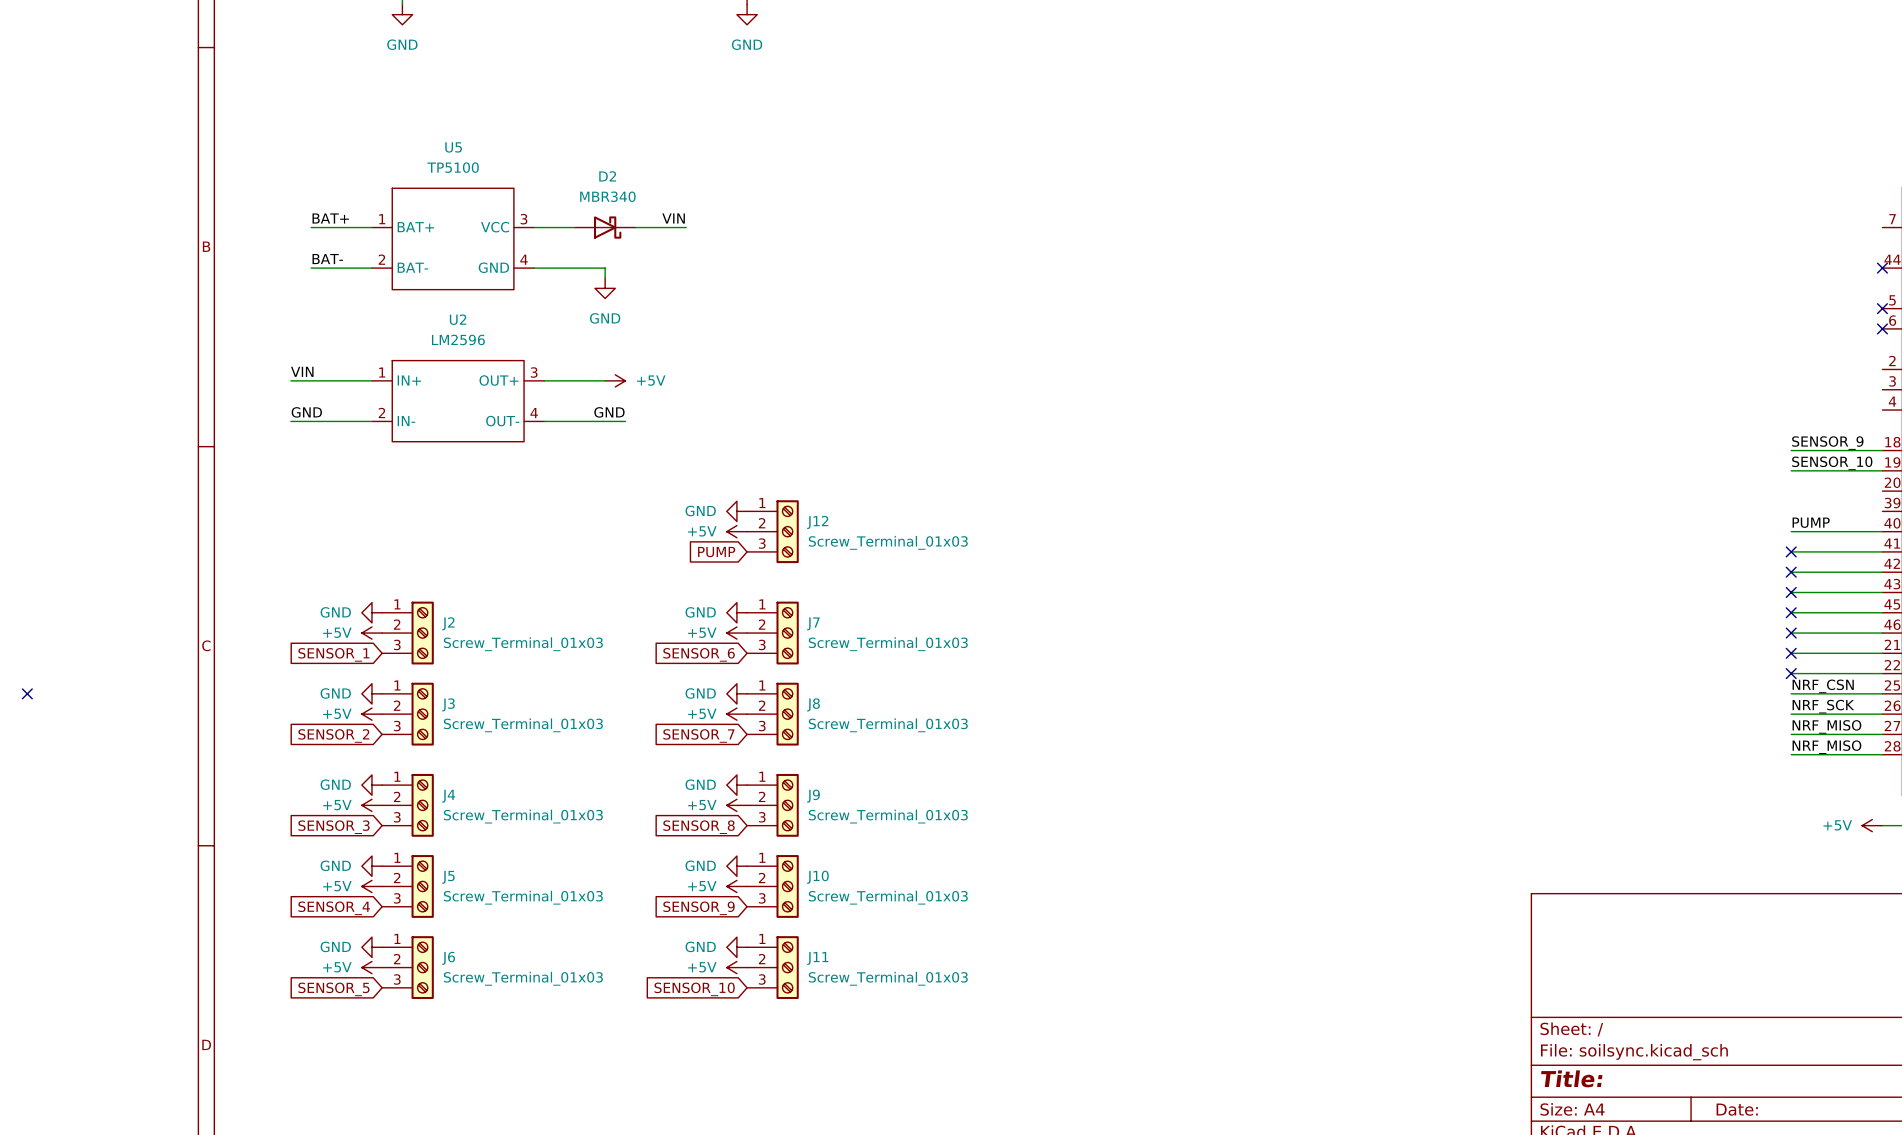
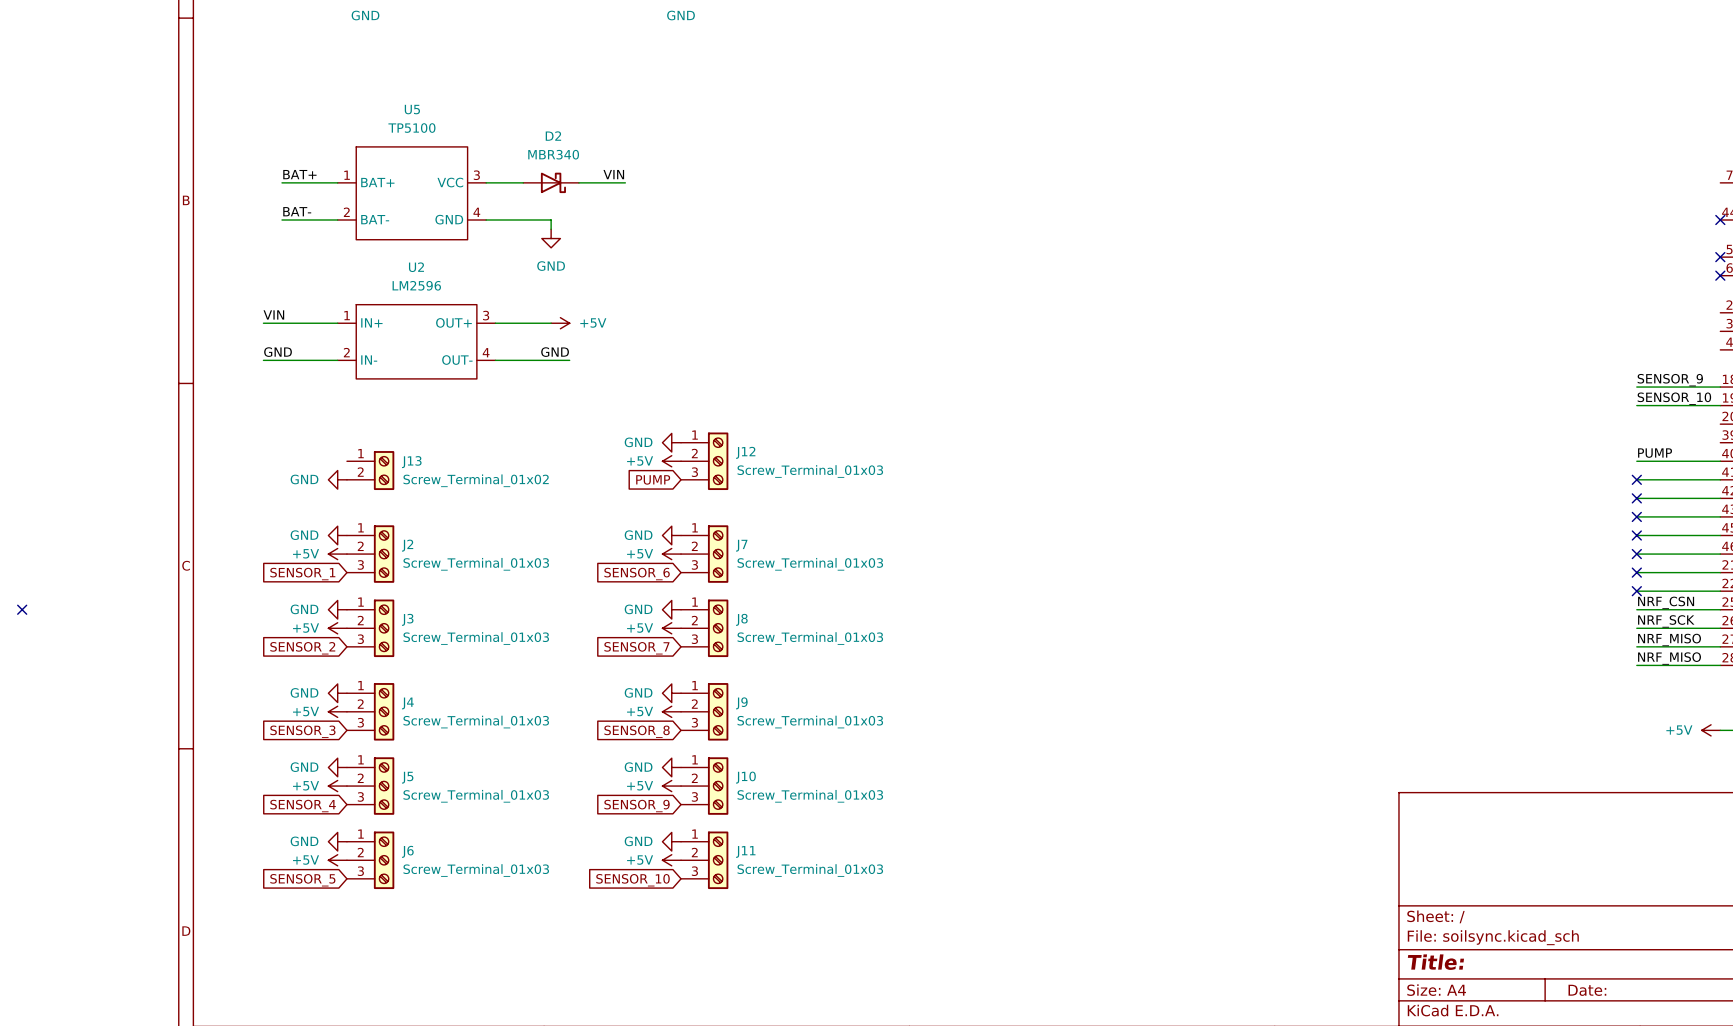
J13: none -> Screw_Terminal_01x02 (370, 470)
power symbol: none -> GND (337, 479)

